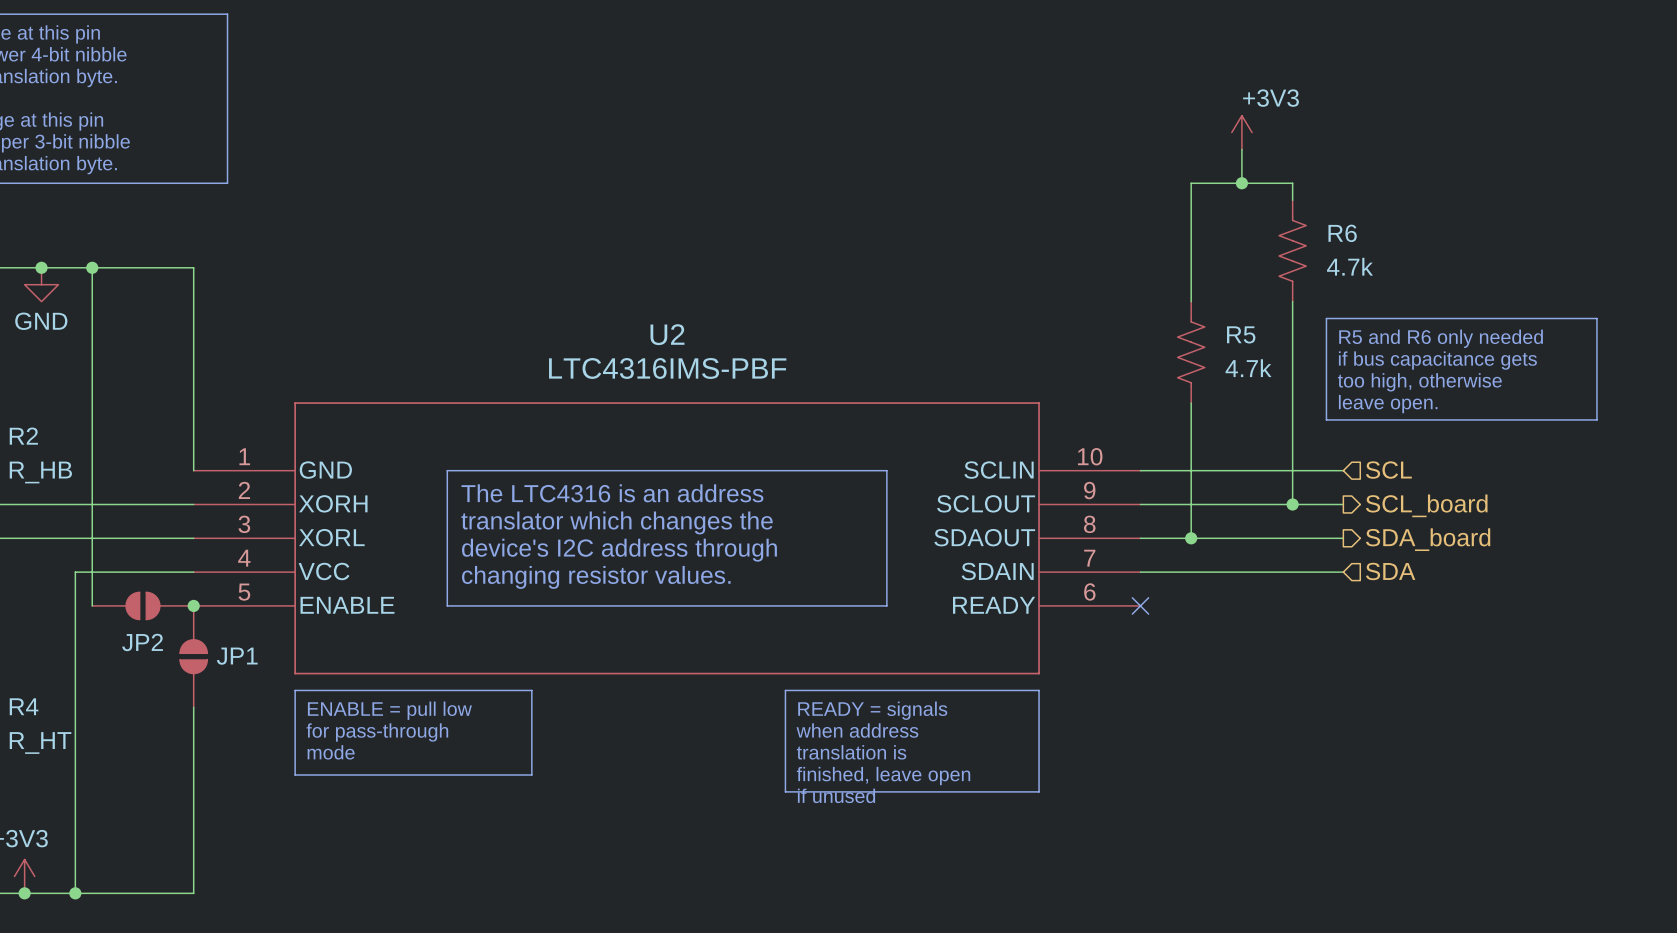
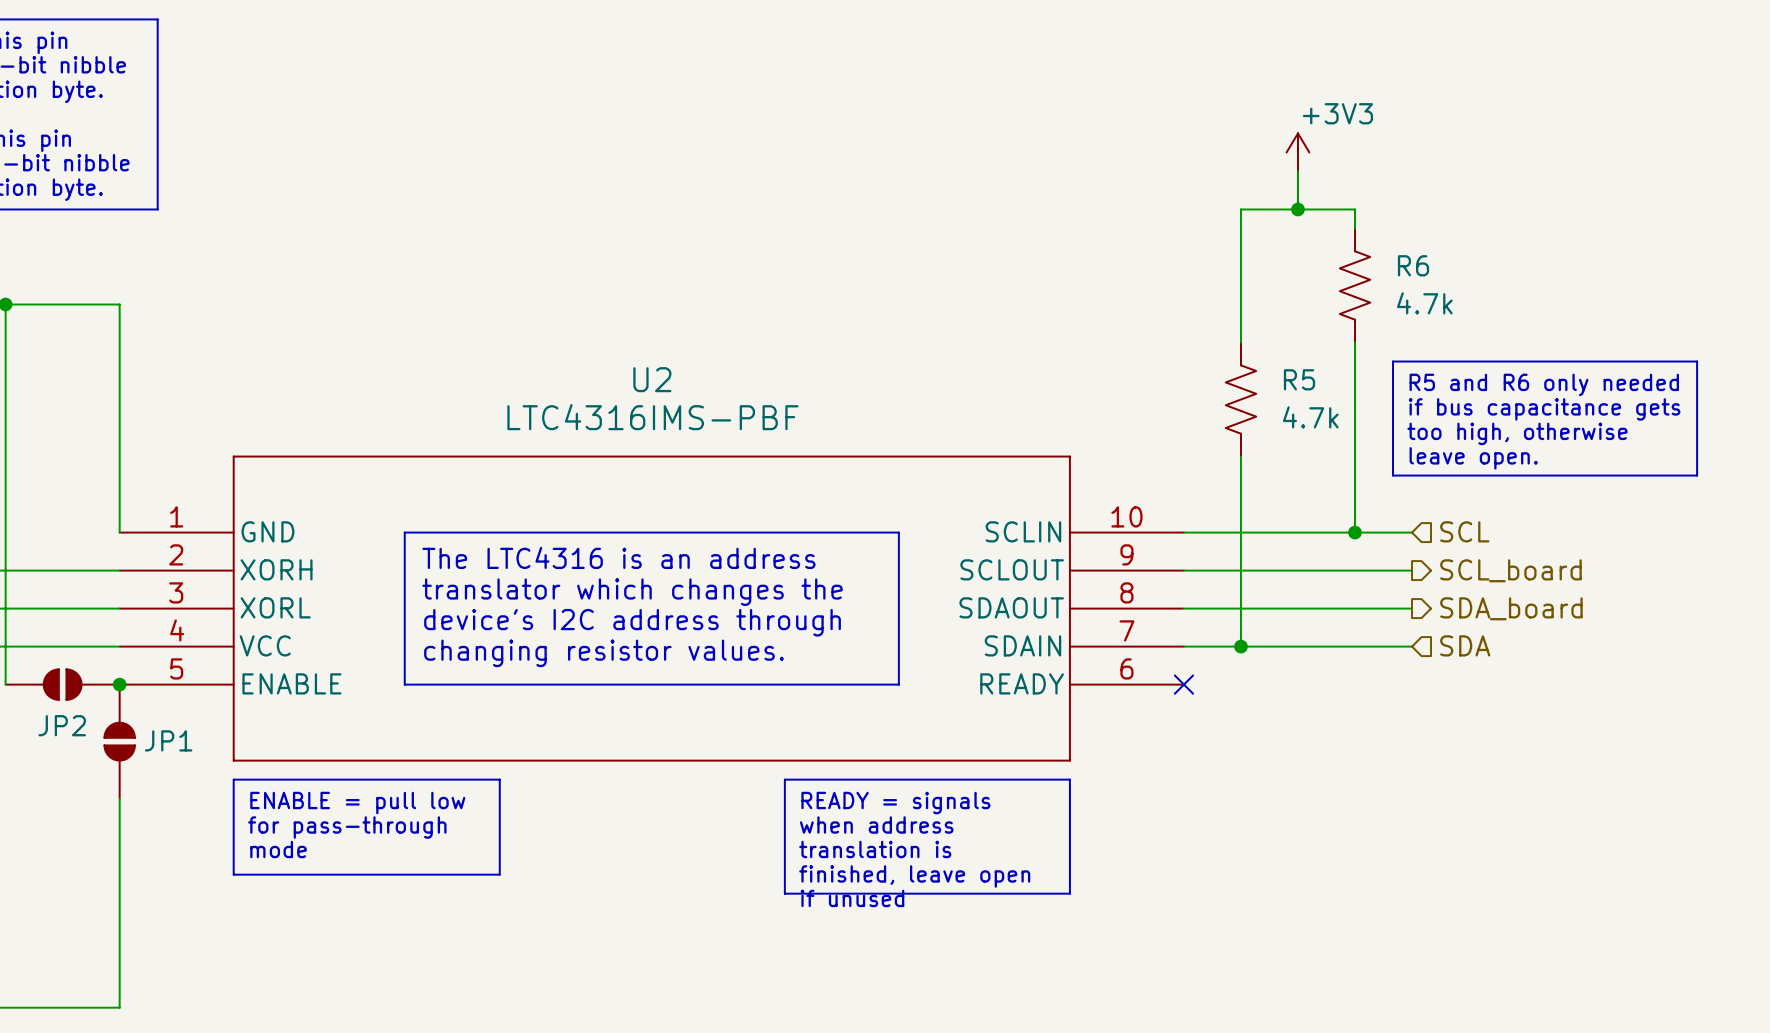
wire: (1292, 470) (1292, 504) -> (1240, 608) (1240, 646)
junction position: (1292, 504) -> (1355, 532)
junction position: (1191, 538) -> (1240, 646)

